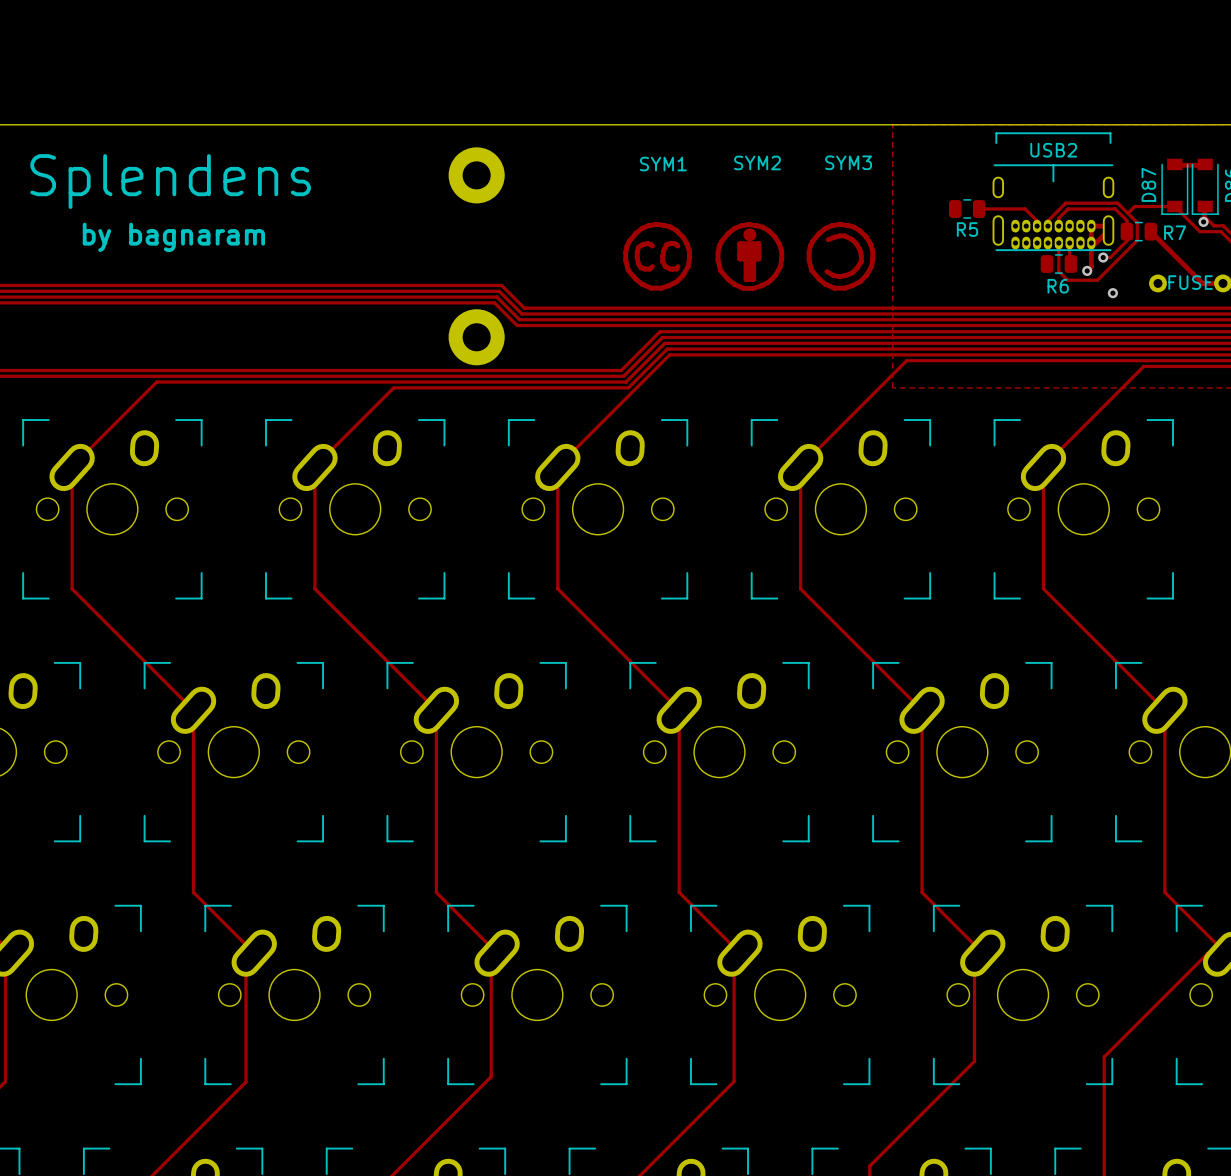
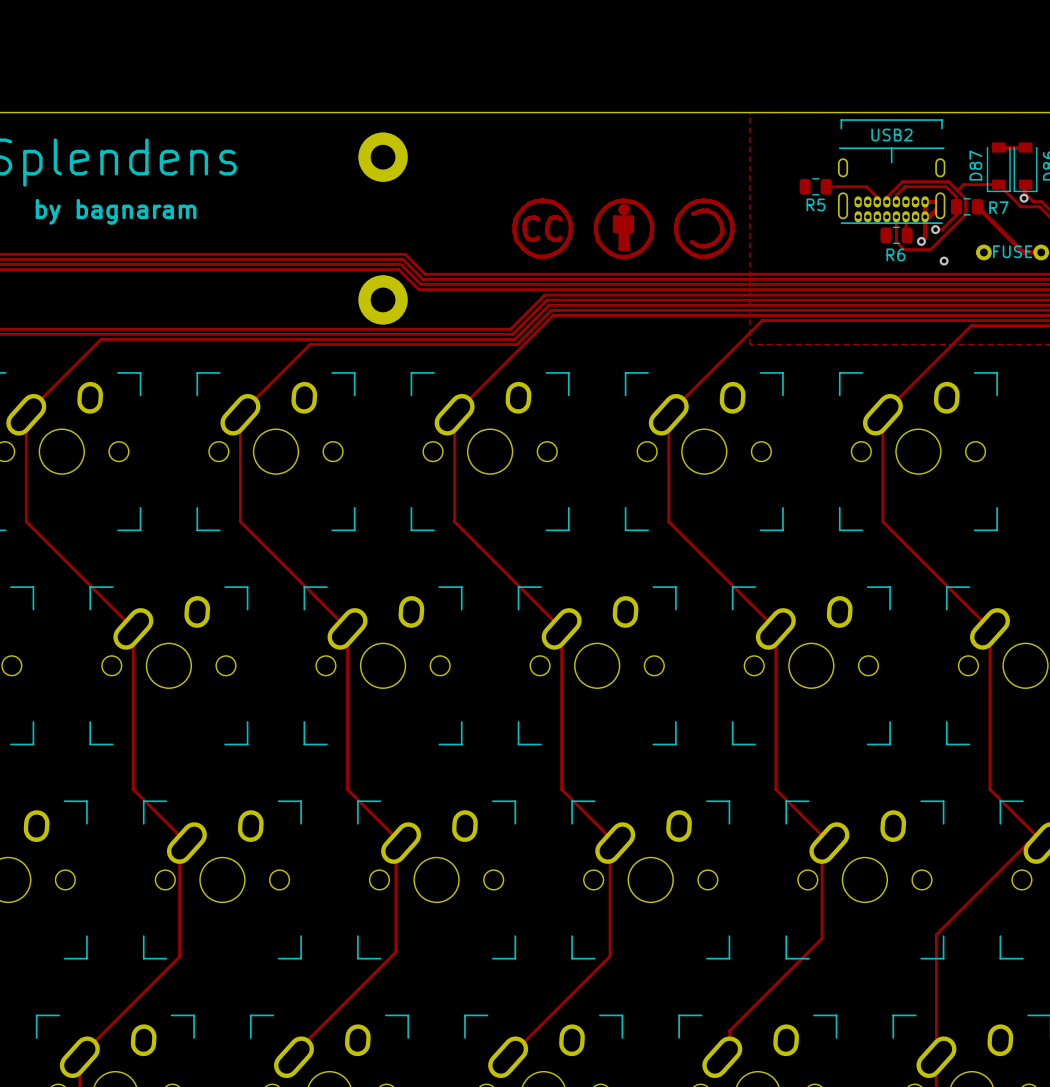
SYM1: (657, 256) -> none
SYM2: (749, 256) -> none
SYM3: (840, 256) -> none

